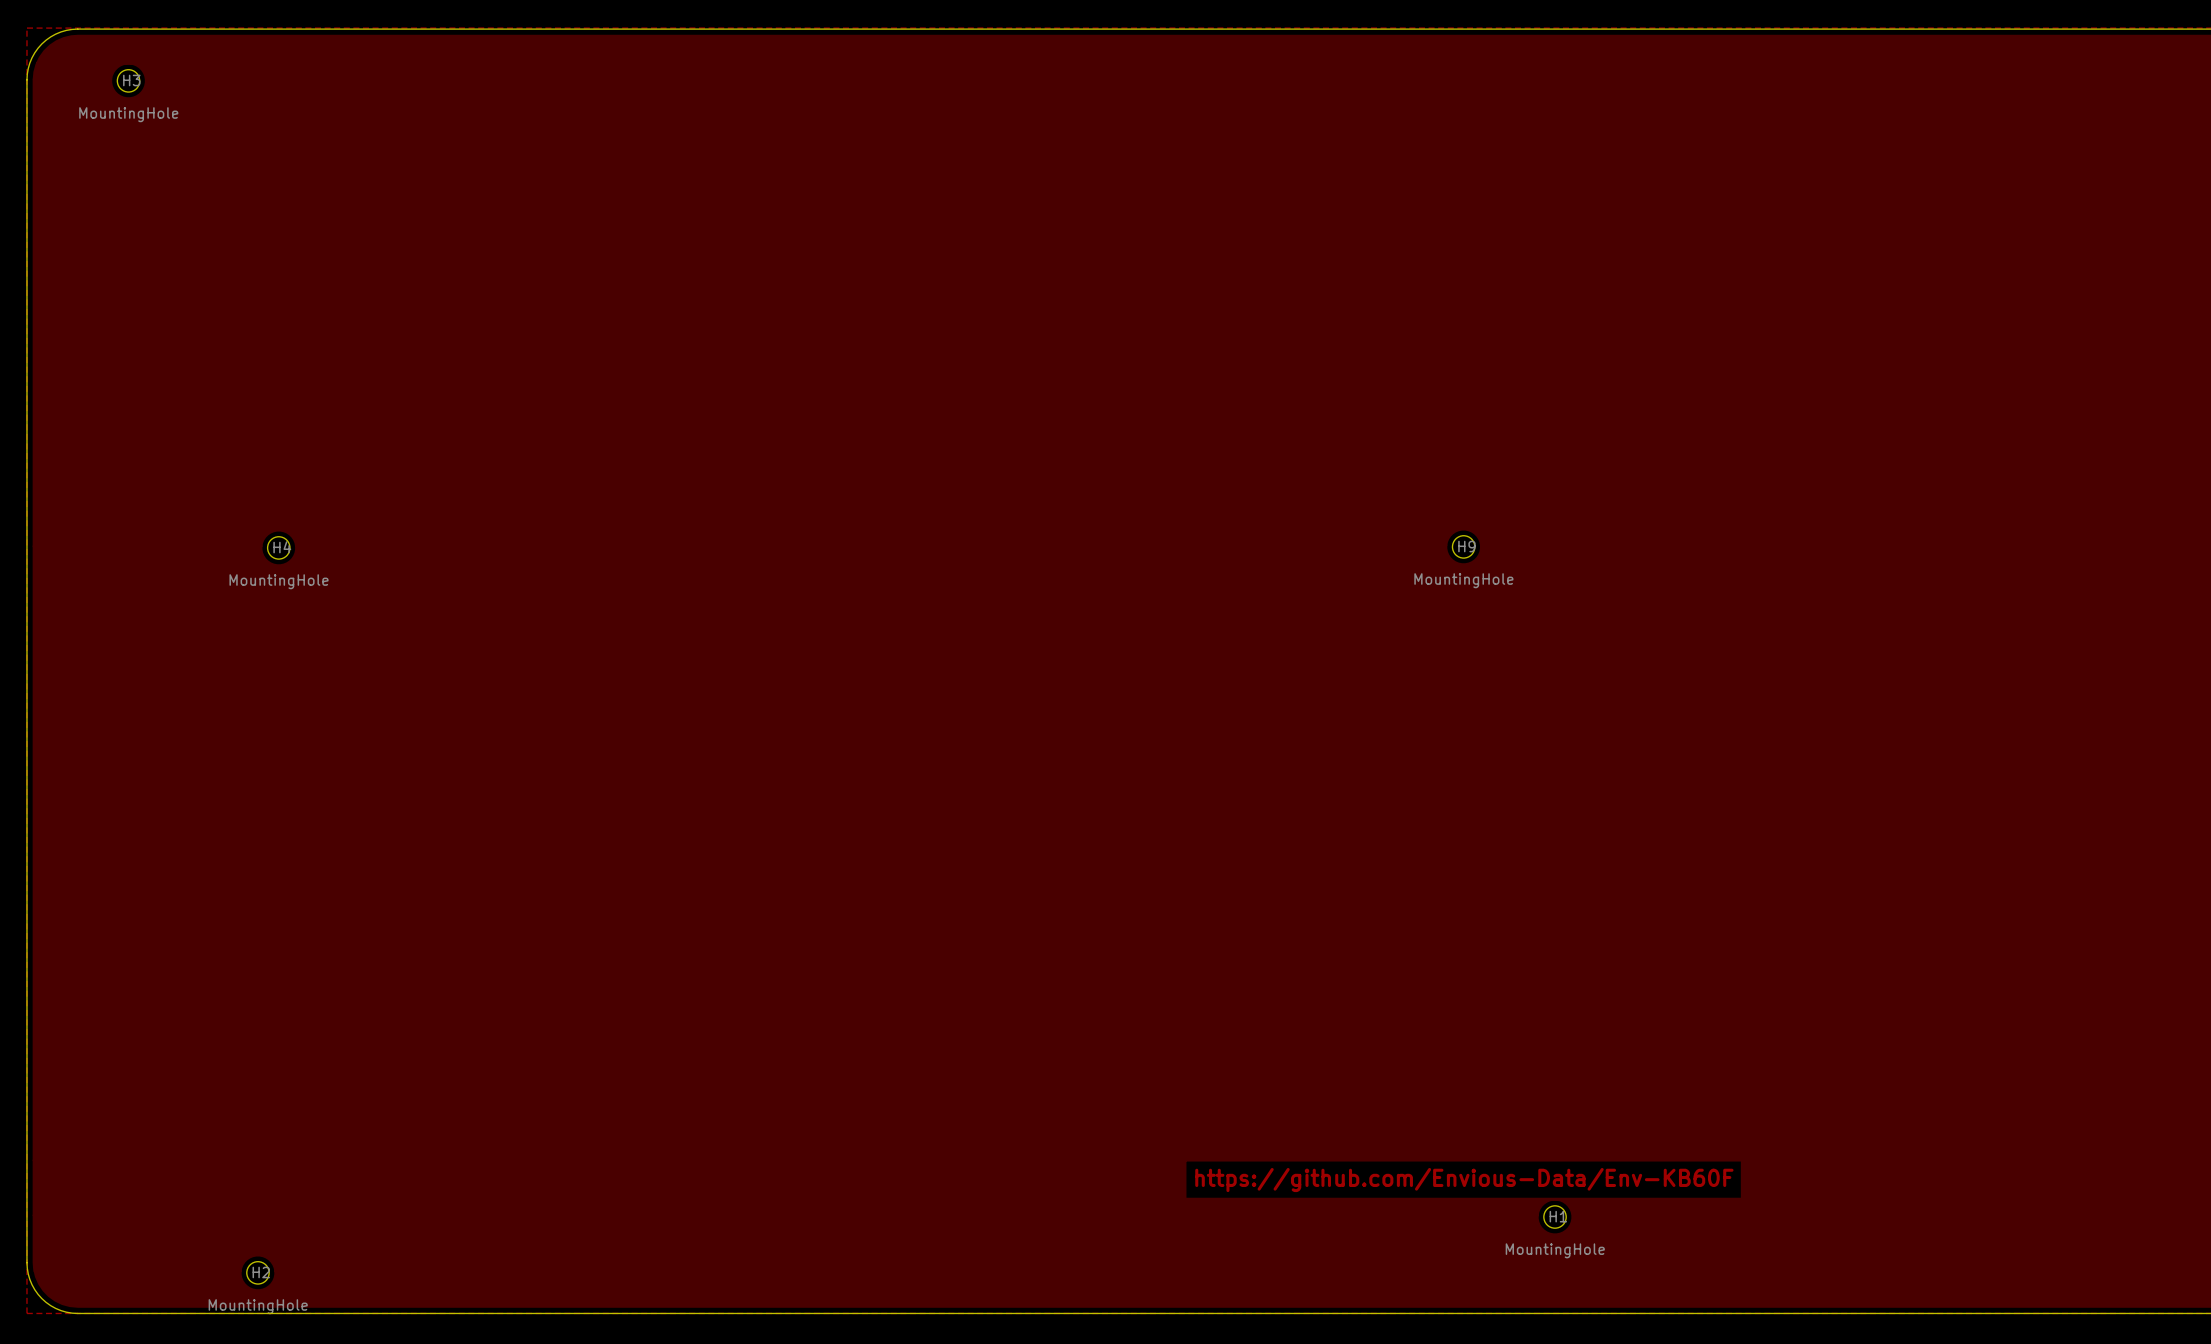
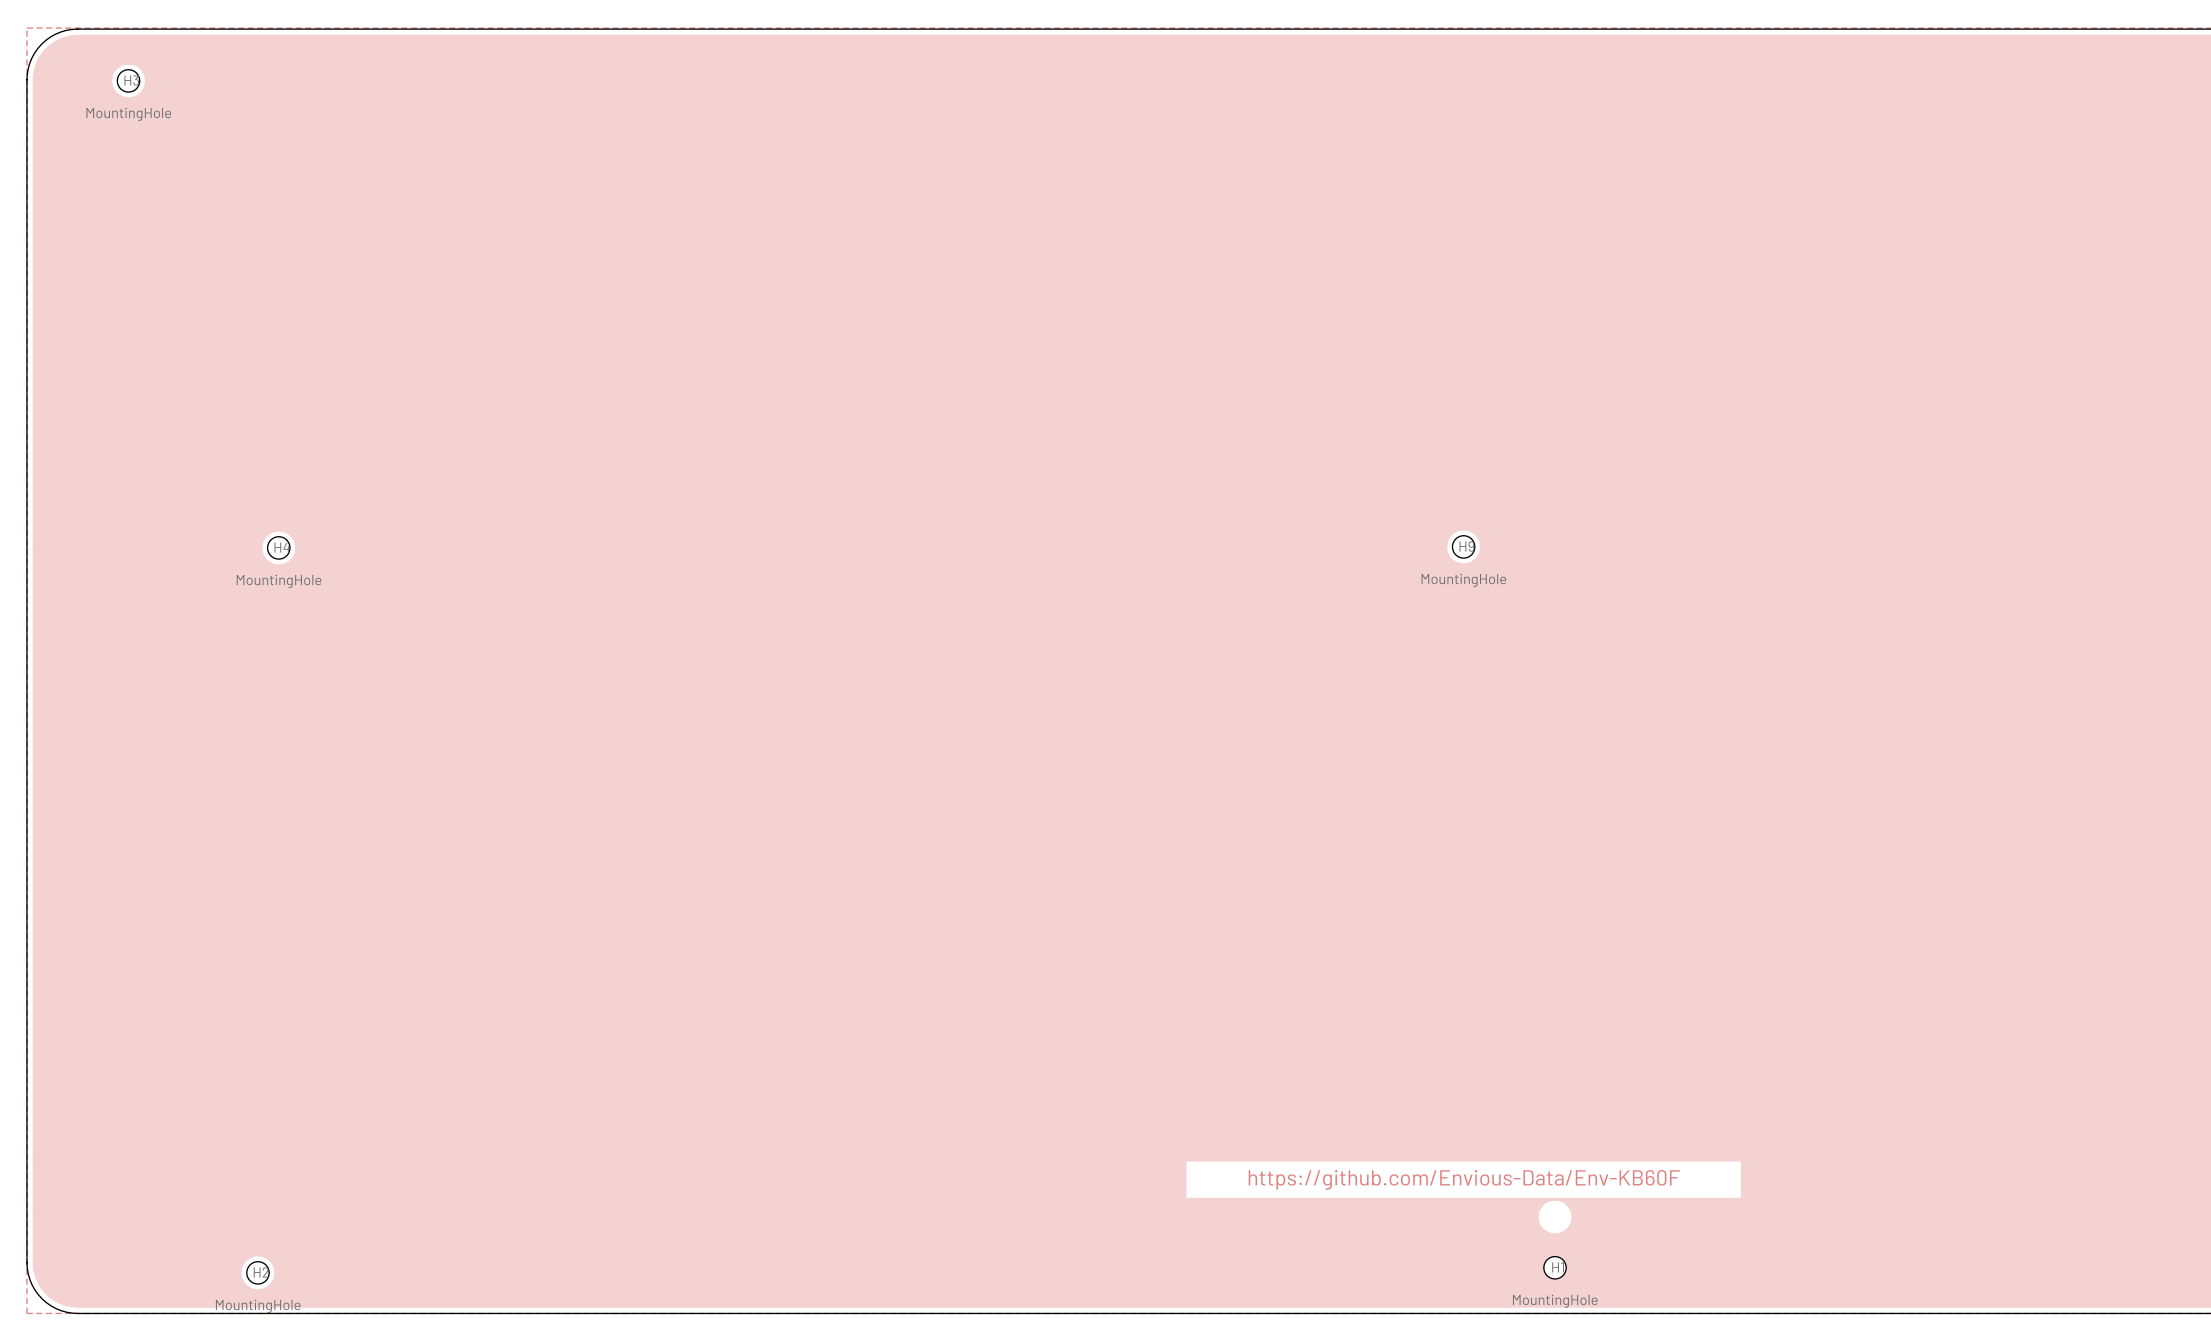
H1 position: (1555, 1217) -> (1555, 1267)

